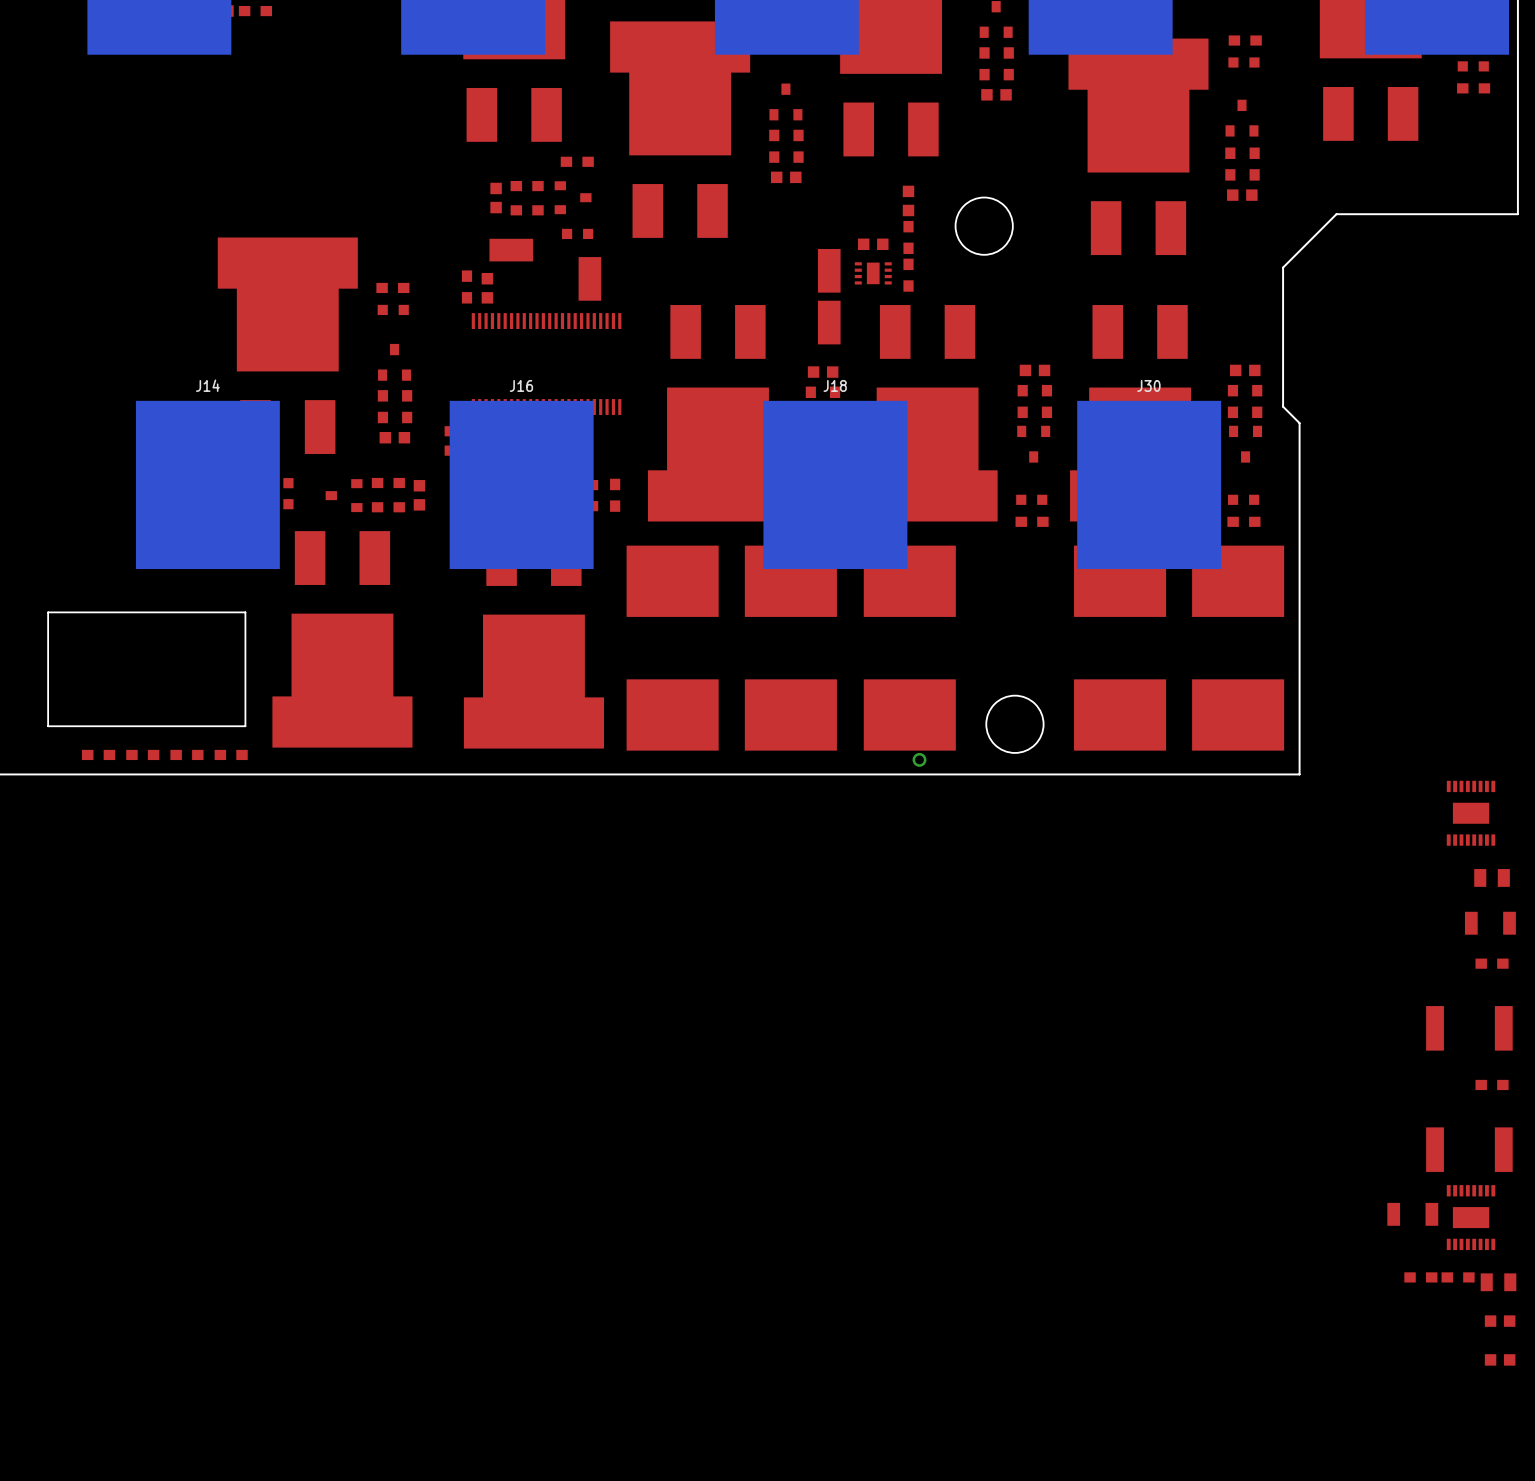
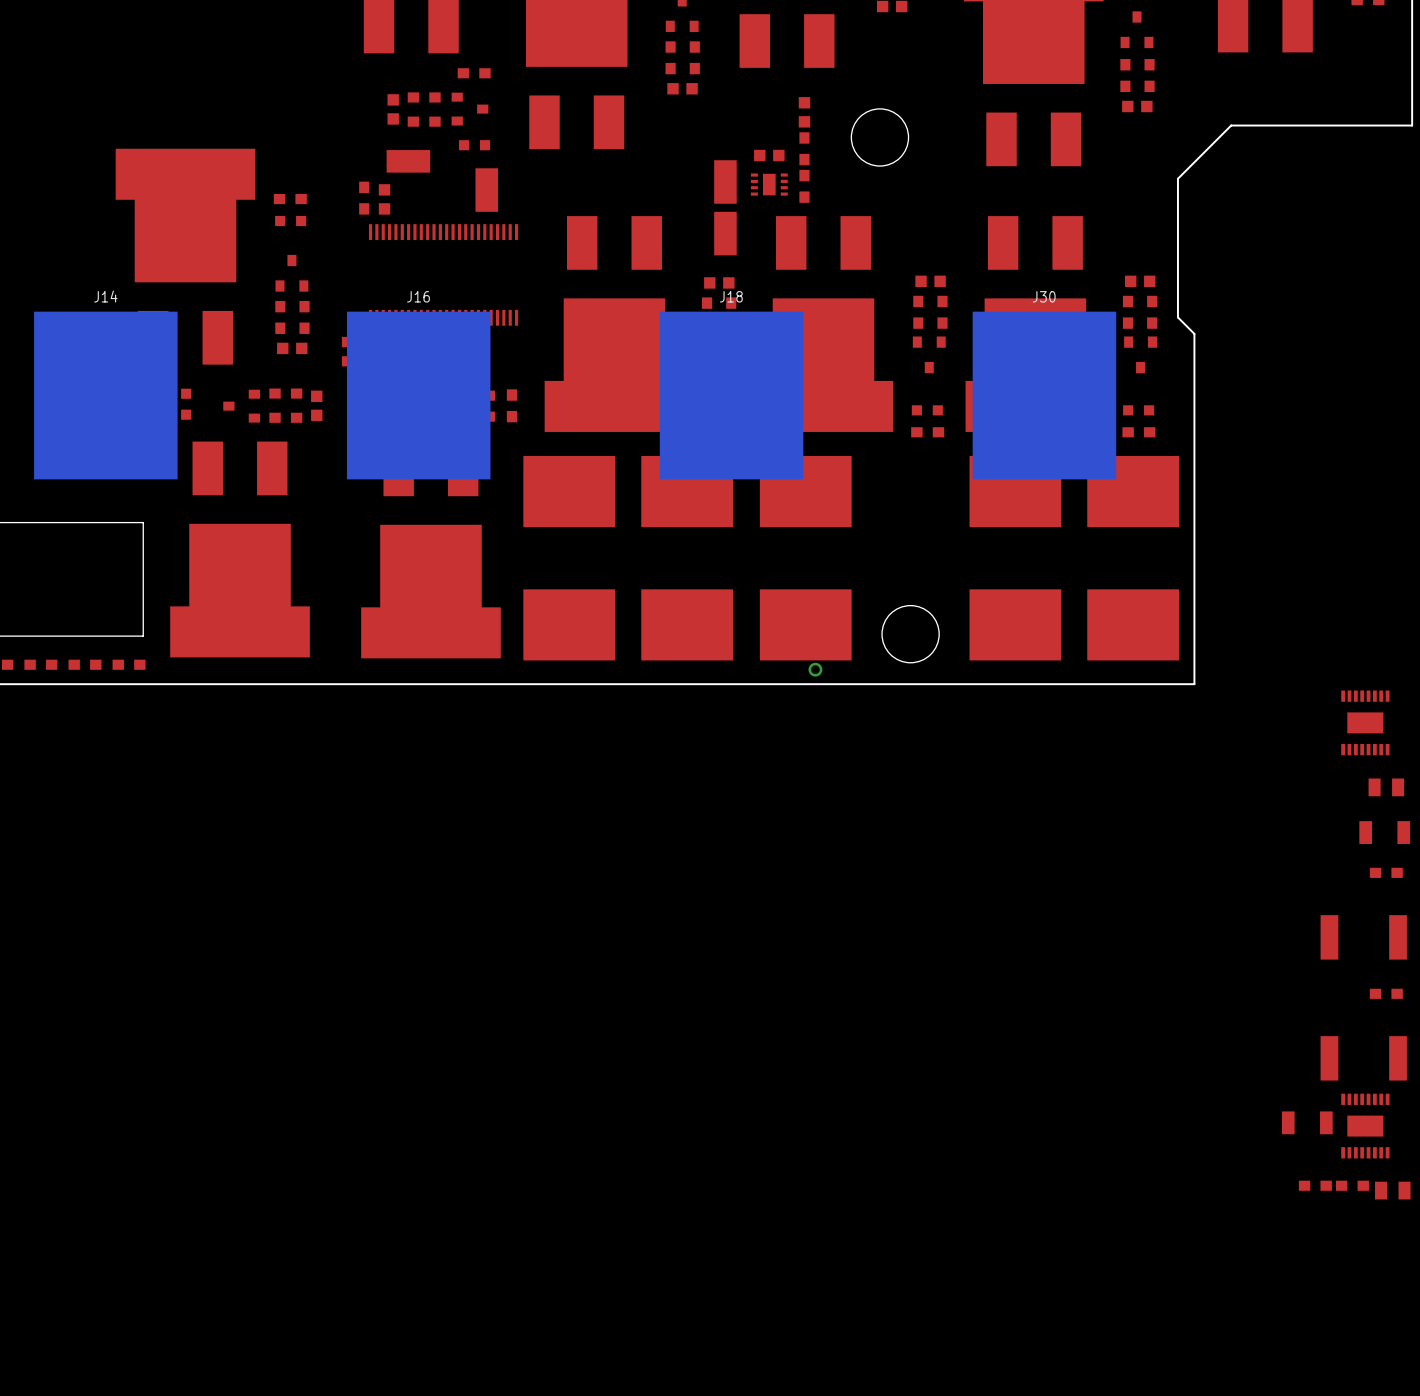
part: (1500, 1321) -> none
part: (1500, 1359) -> none

